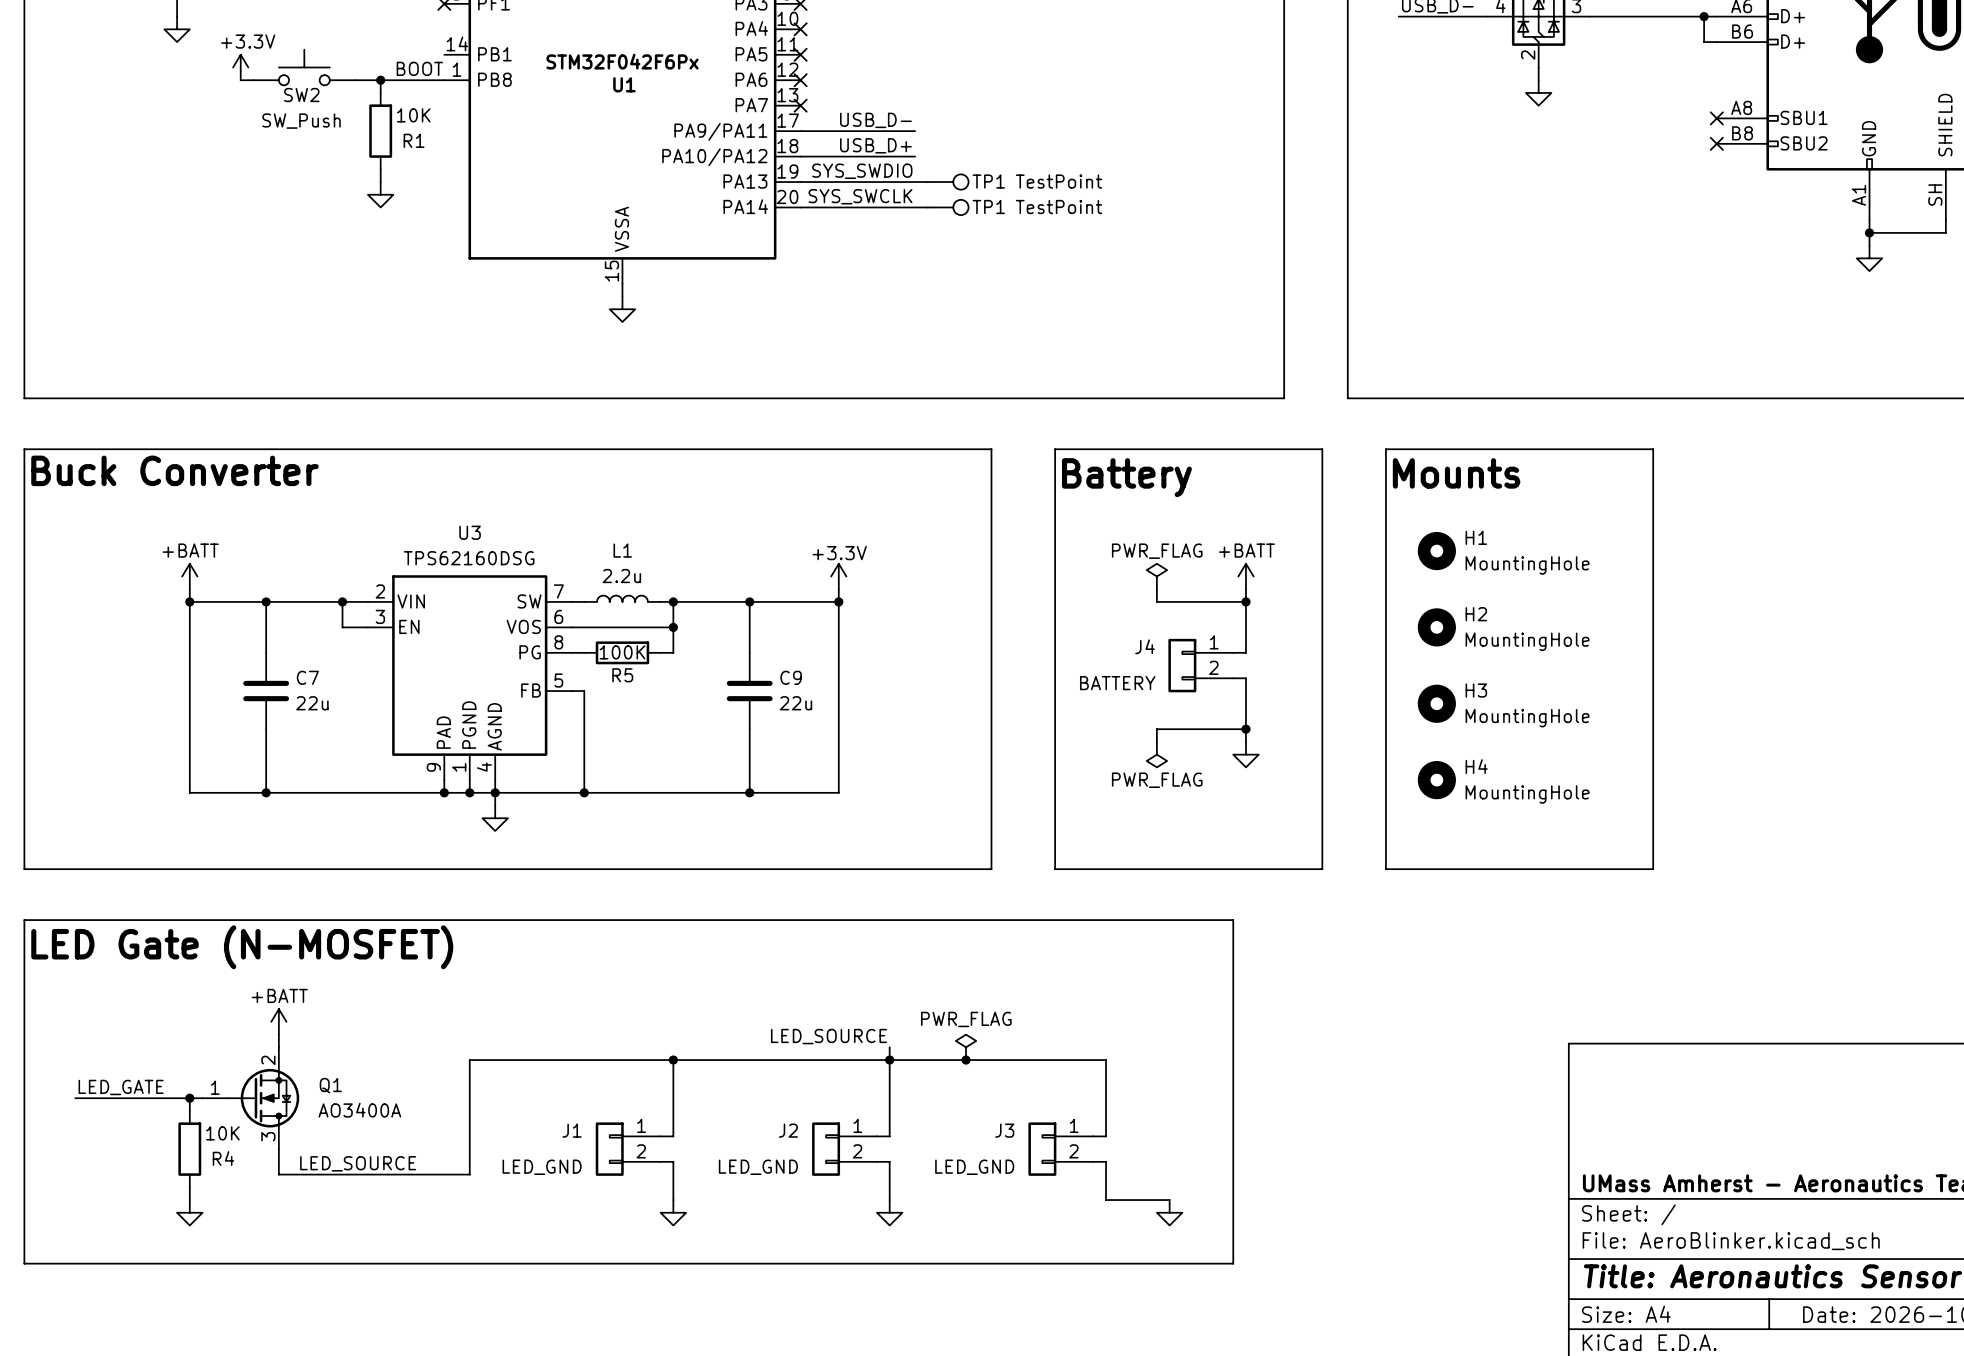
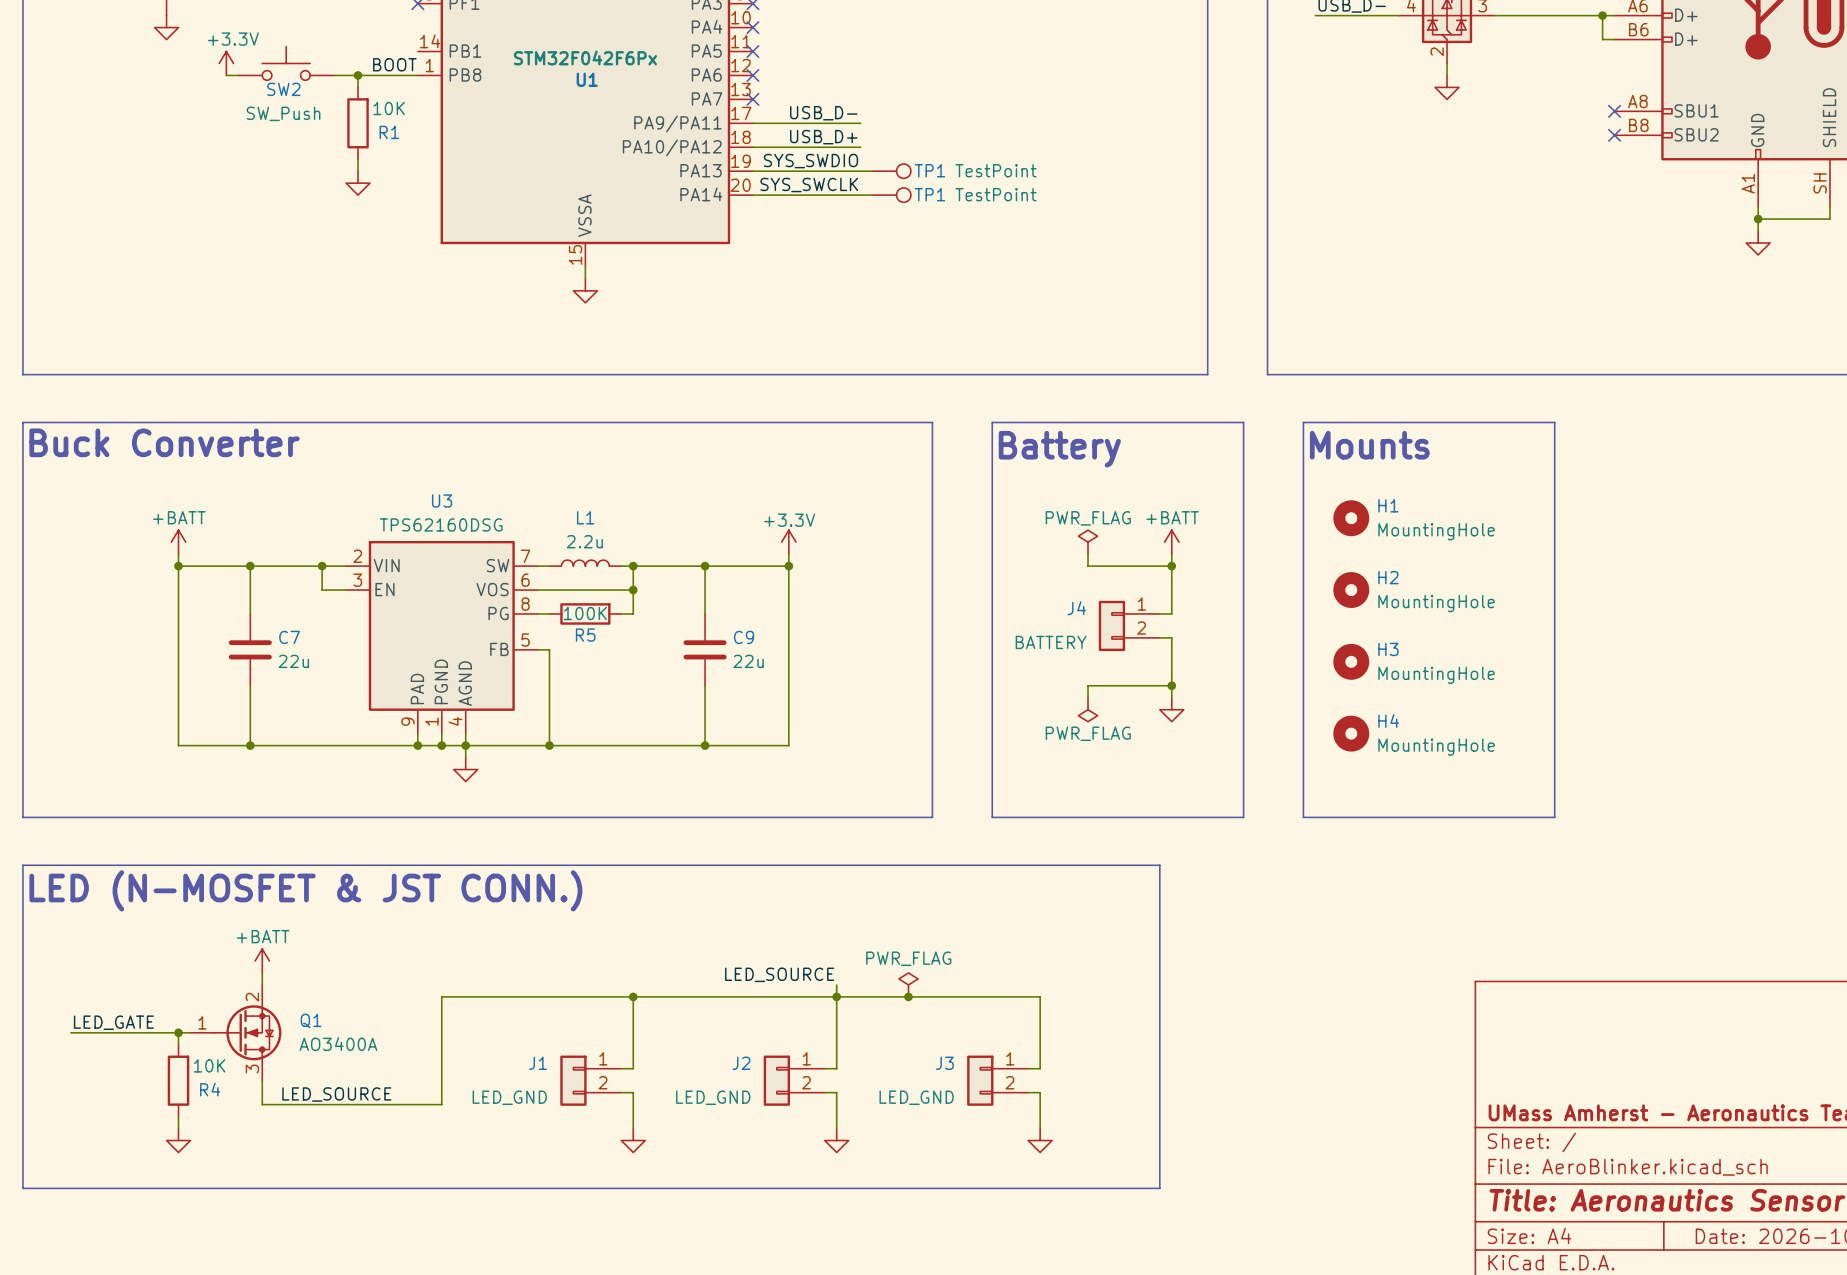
text: LED Gate (N-MOSFET) (242, 947) -> LED (N-MOSFET & JST CONN.) (305, 890)
wire: (1106, 1200) (1169, 1200) -> none
power symbol position: (1169, 1212) -> (1040, 1140)

